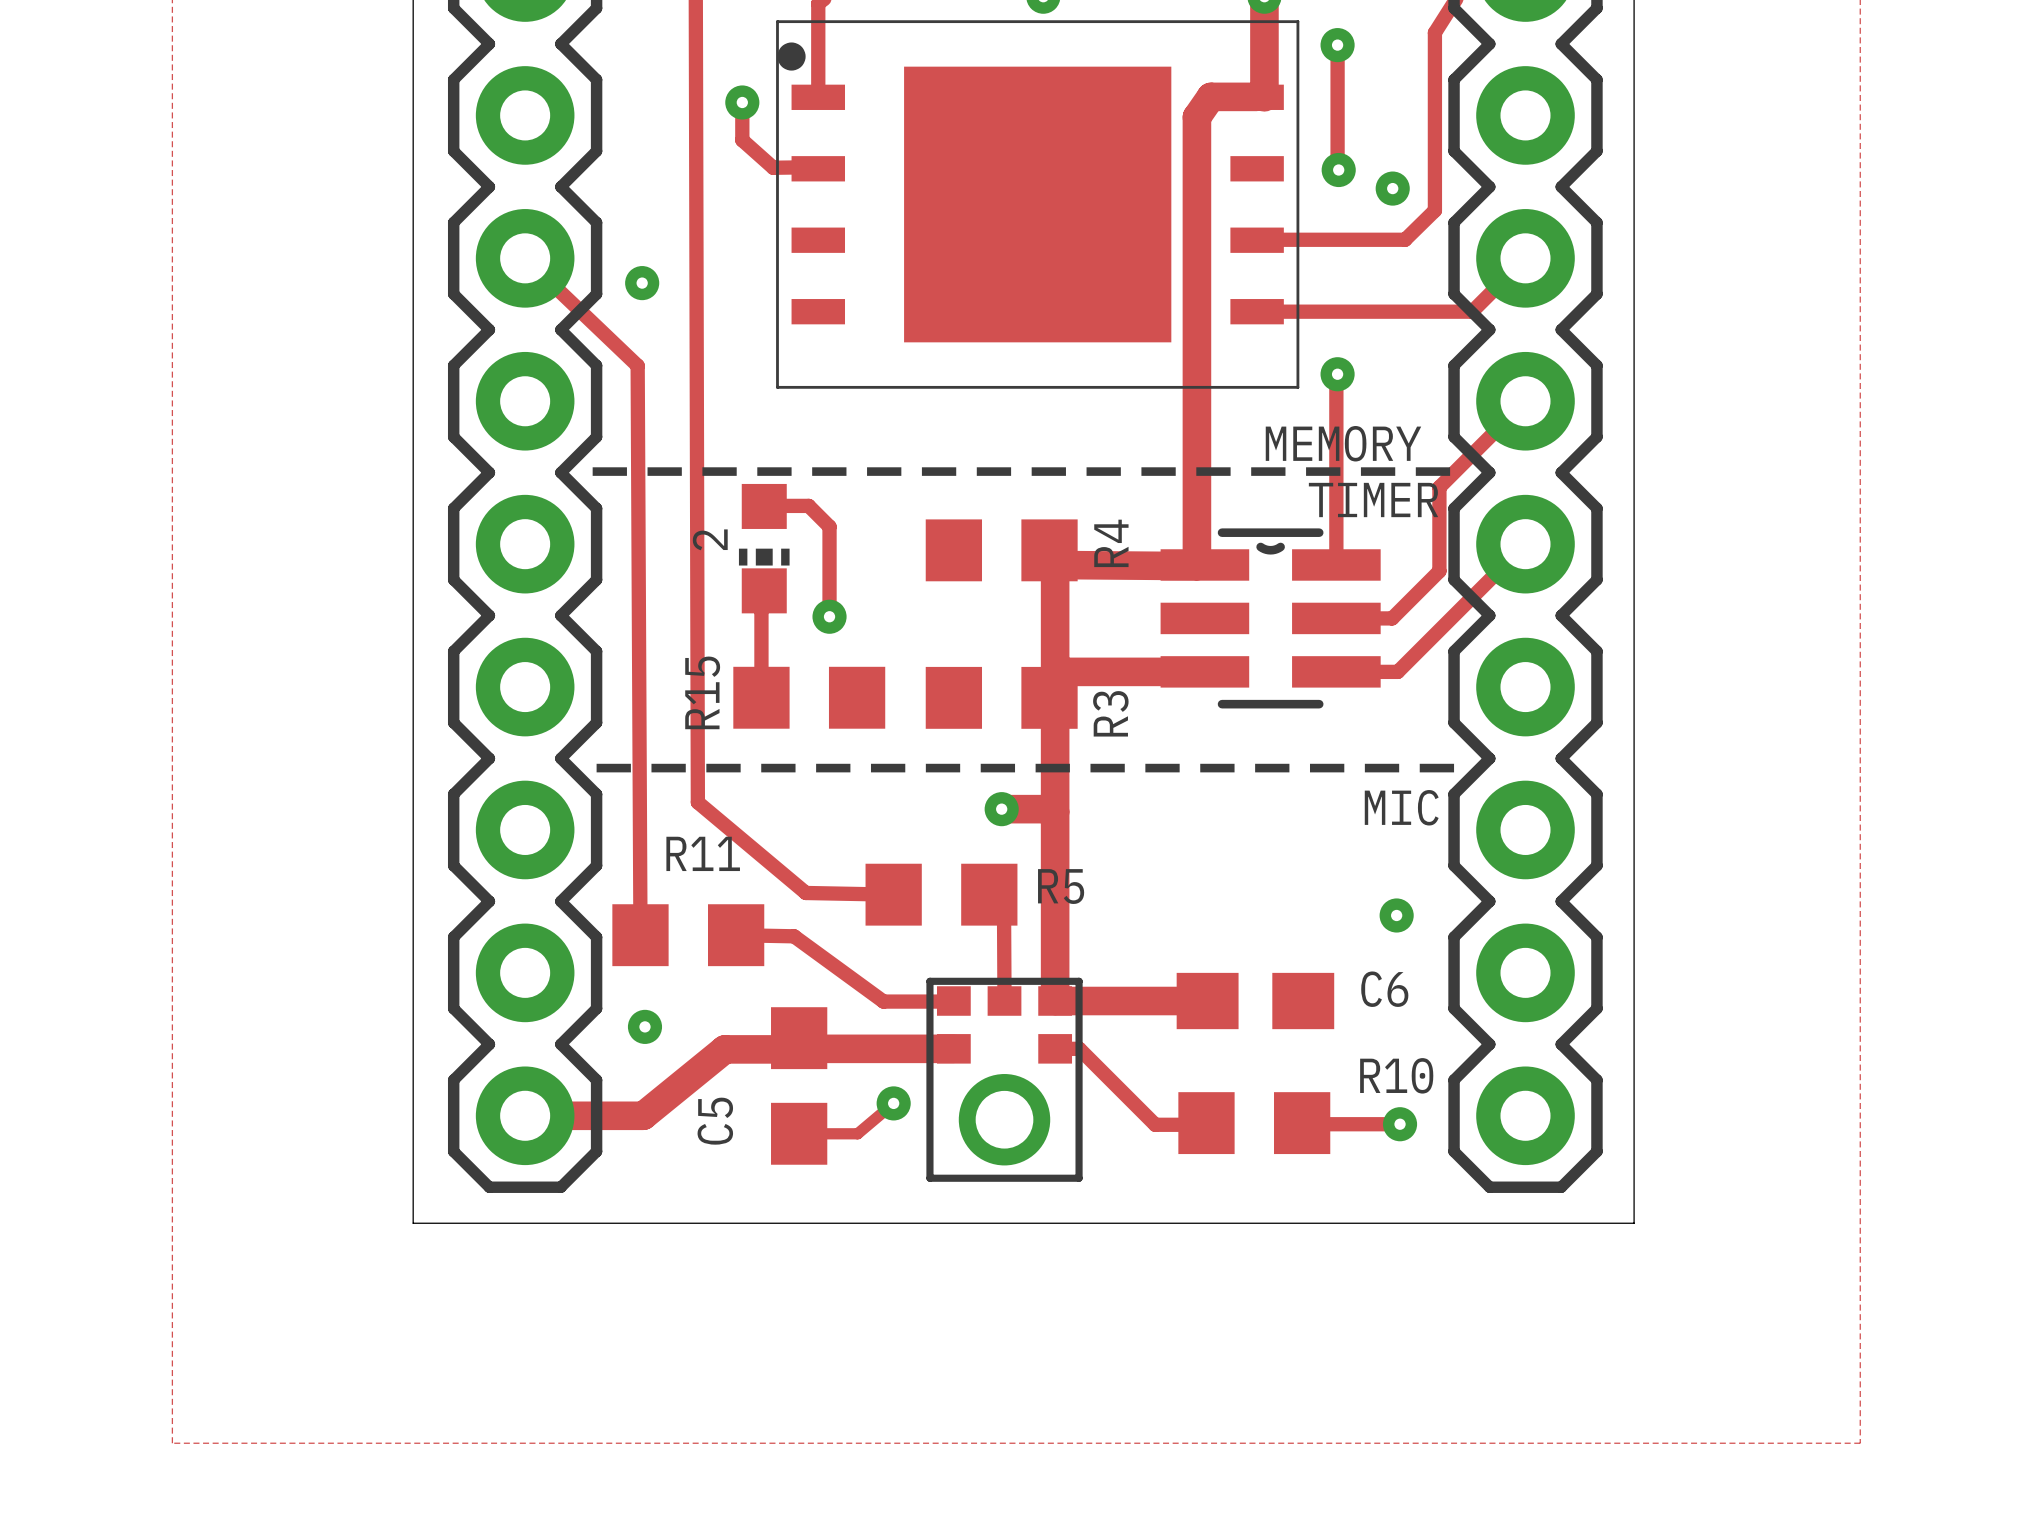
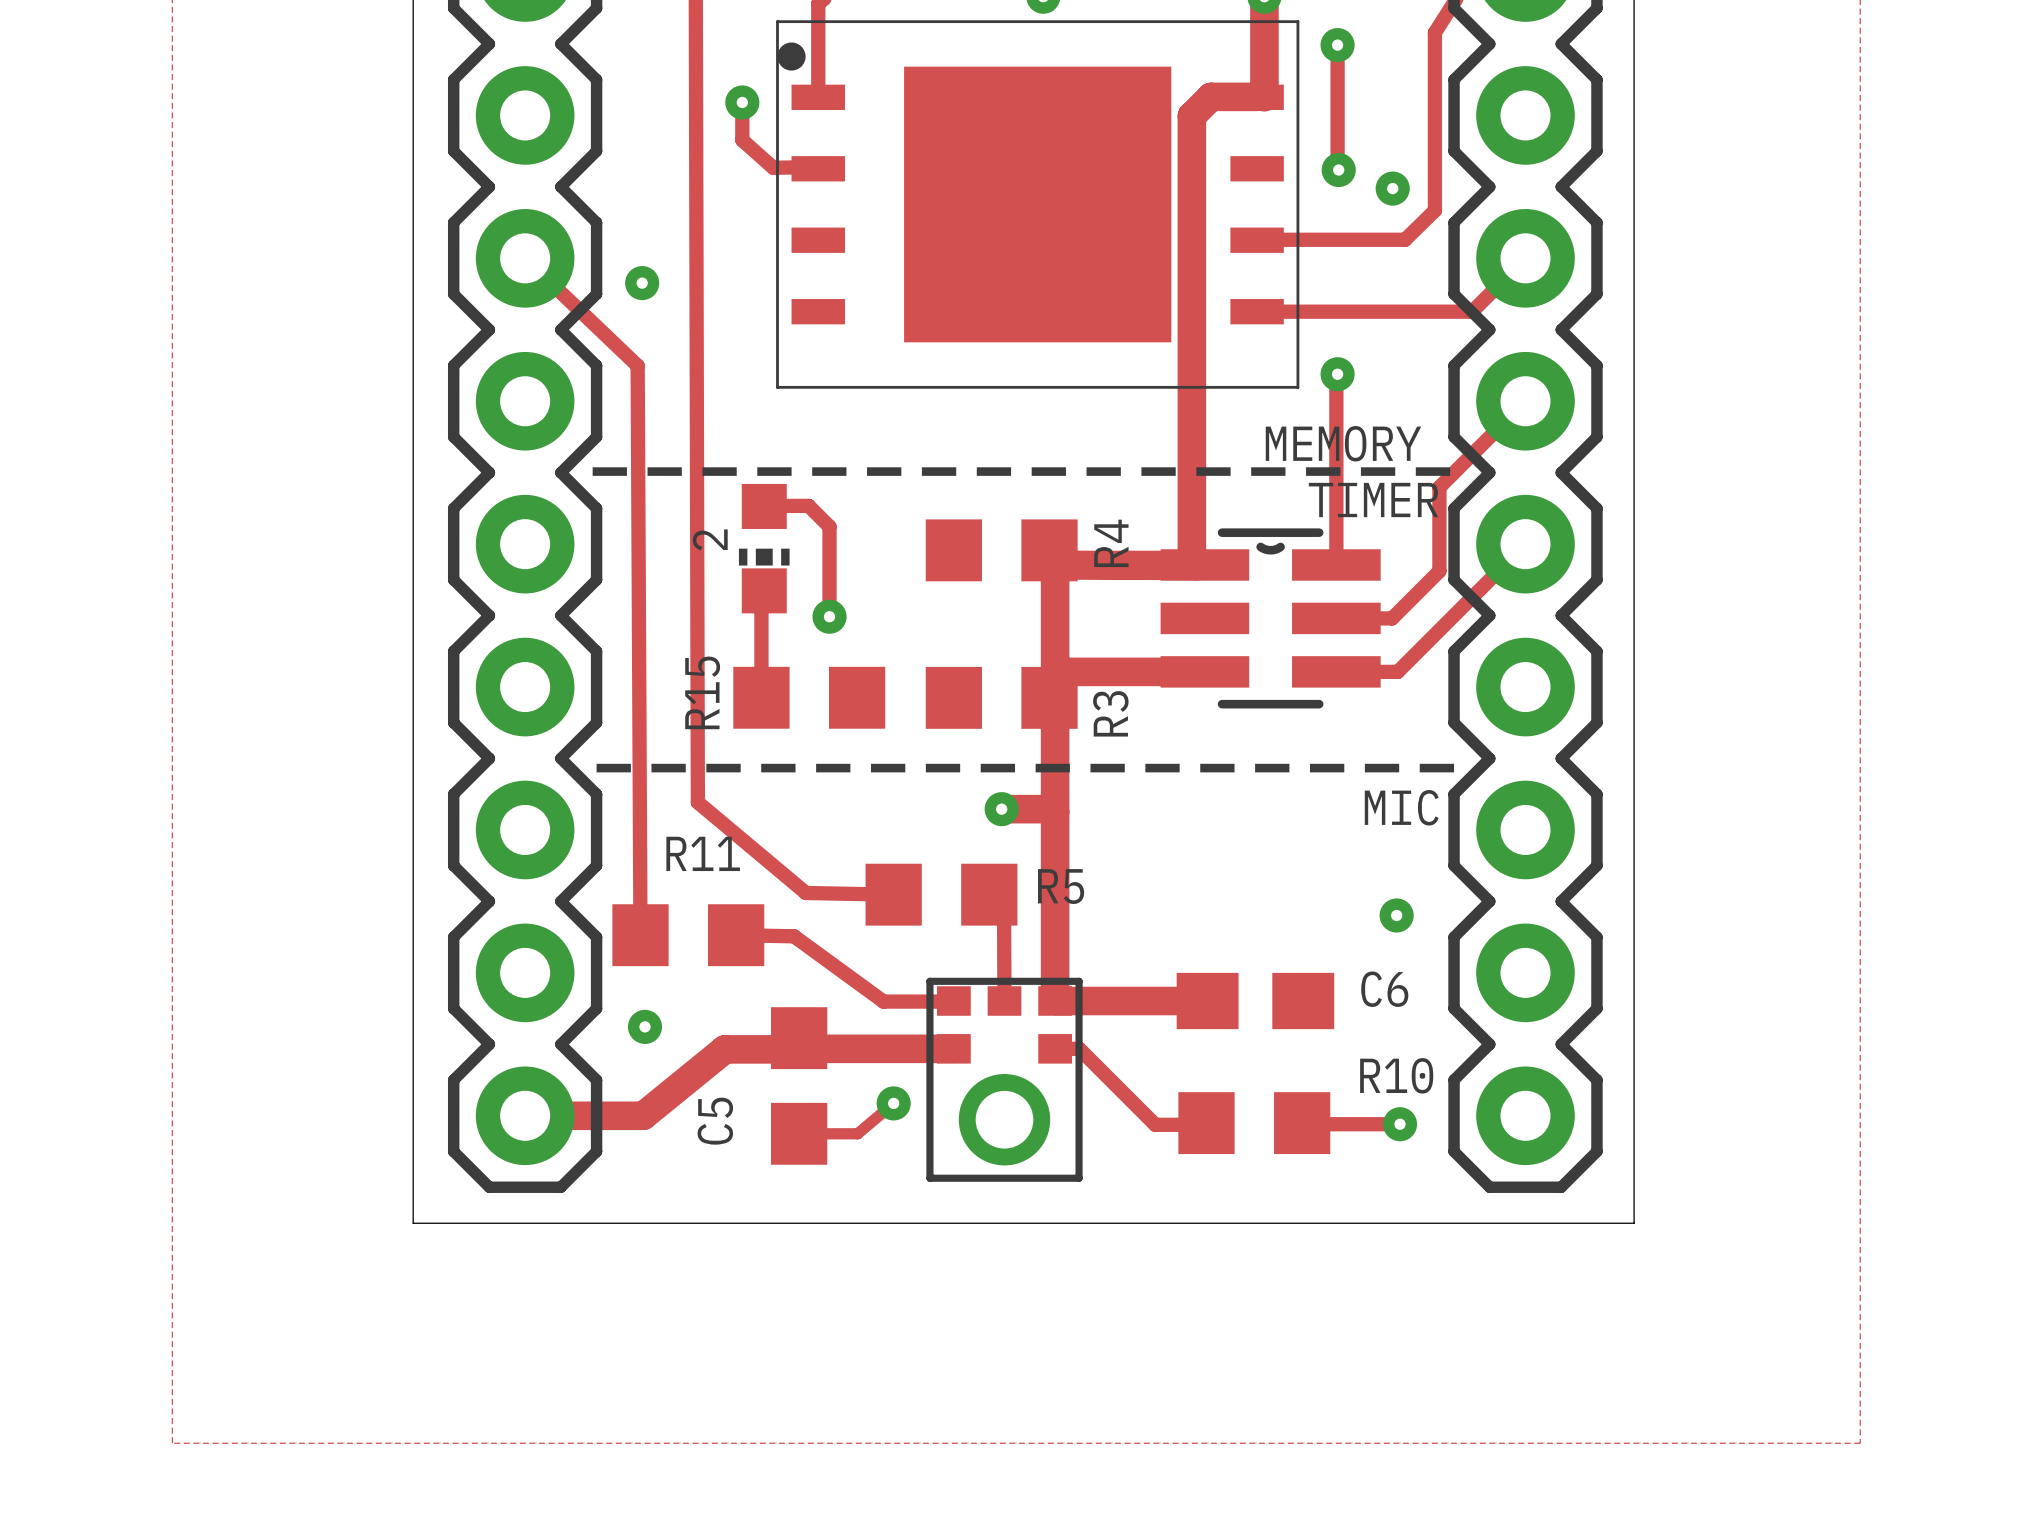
track: (1210, 96) (1196, 117) (1196, 566) -> (1210, 96) (1191, 115) (1191, 564) (1204, 564) (1049, 564)

